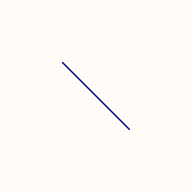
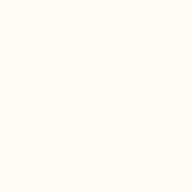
wire: (62, 62) (129, 129) -> none

